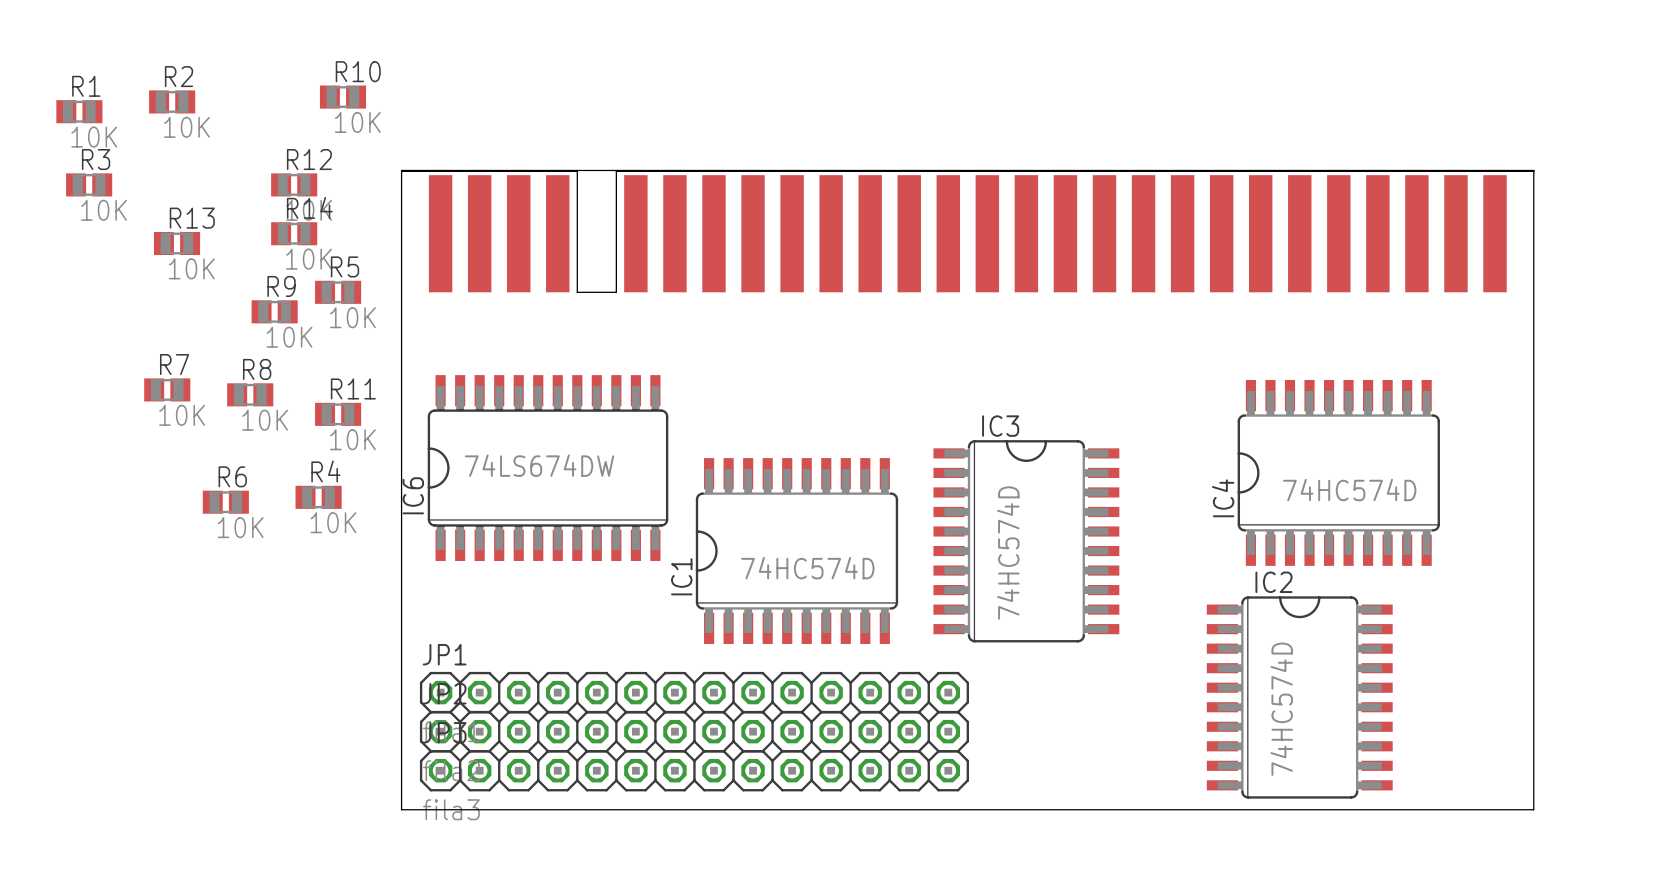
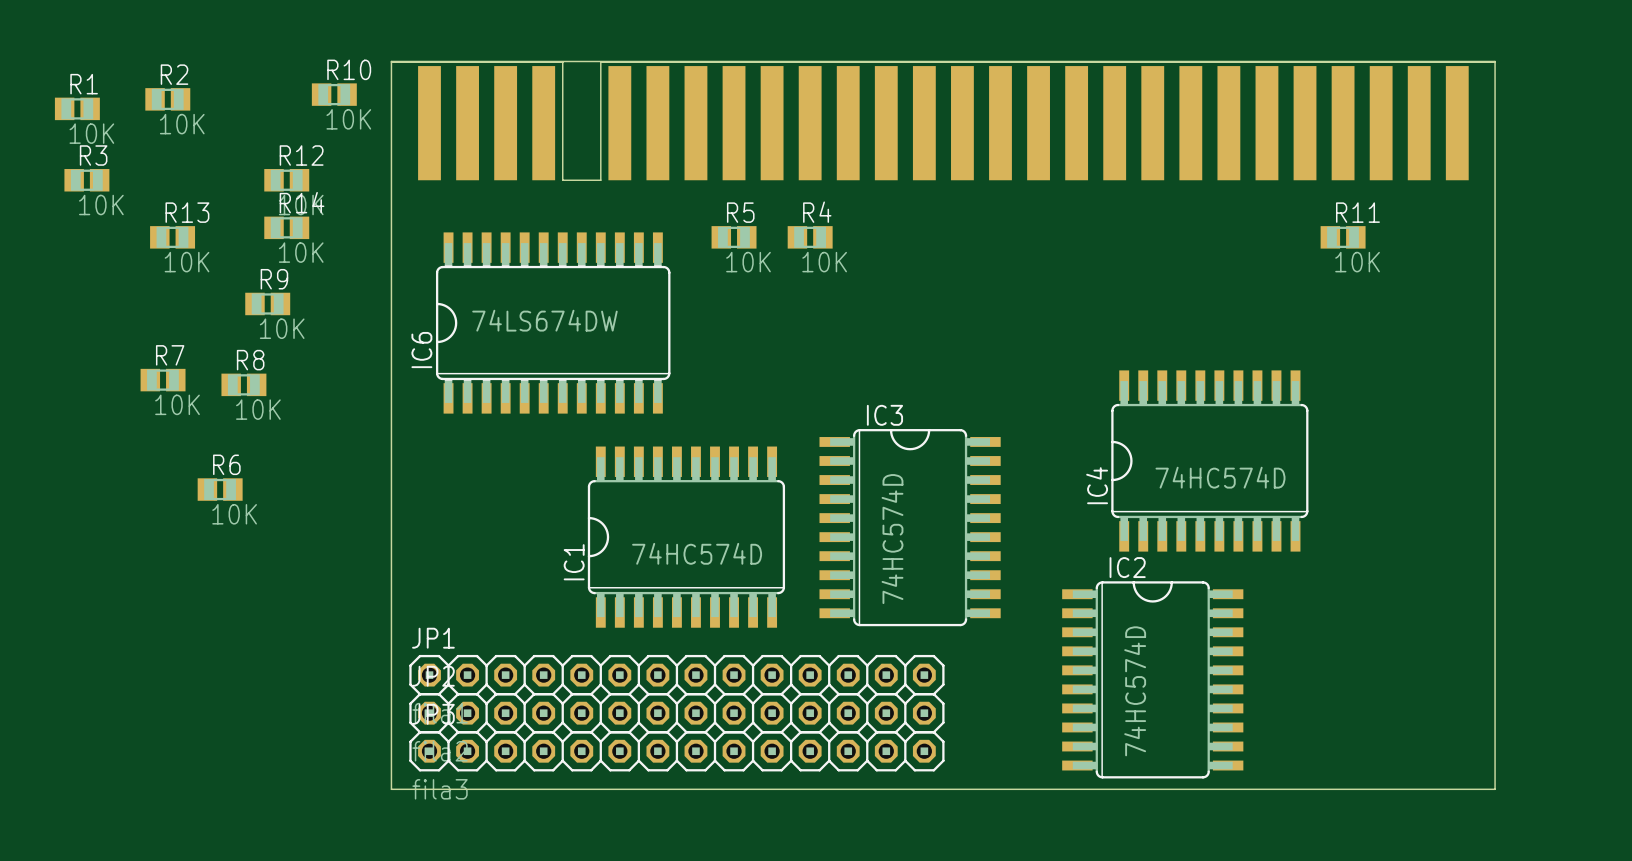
board edge: (401, 170) (1533, 170) -> (391, 166) (391, 61) (1495, 61) (1495, 166)
part position: (967, 231) -> (943, 121)
R5 position: (338, 292) -> (734, 237)
R11 position: (338, 414) -> (1343, 237)
IC6 position: (548, 468) -> (553, 323)
IC4 position: (1338, 472) -> (1209, 460)
R4 position: (318, 497) -> (810, 237)
IC3 position: (1026, 541) -> (910, 527)
IC1 position: (796, 551) -> (686, 537)
IC2 position: (1299, 697) -> (1152, 679)

